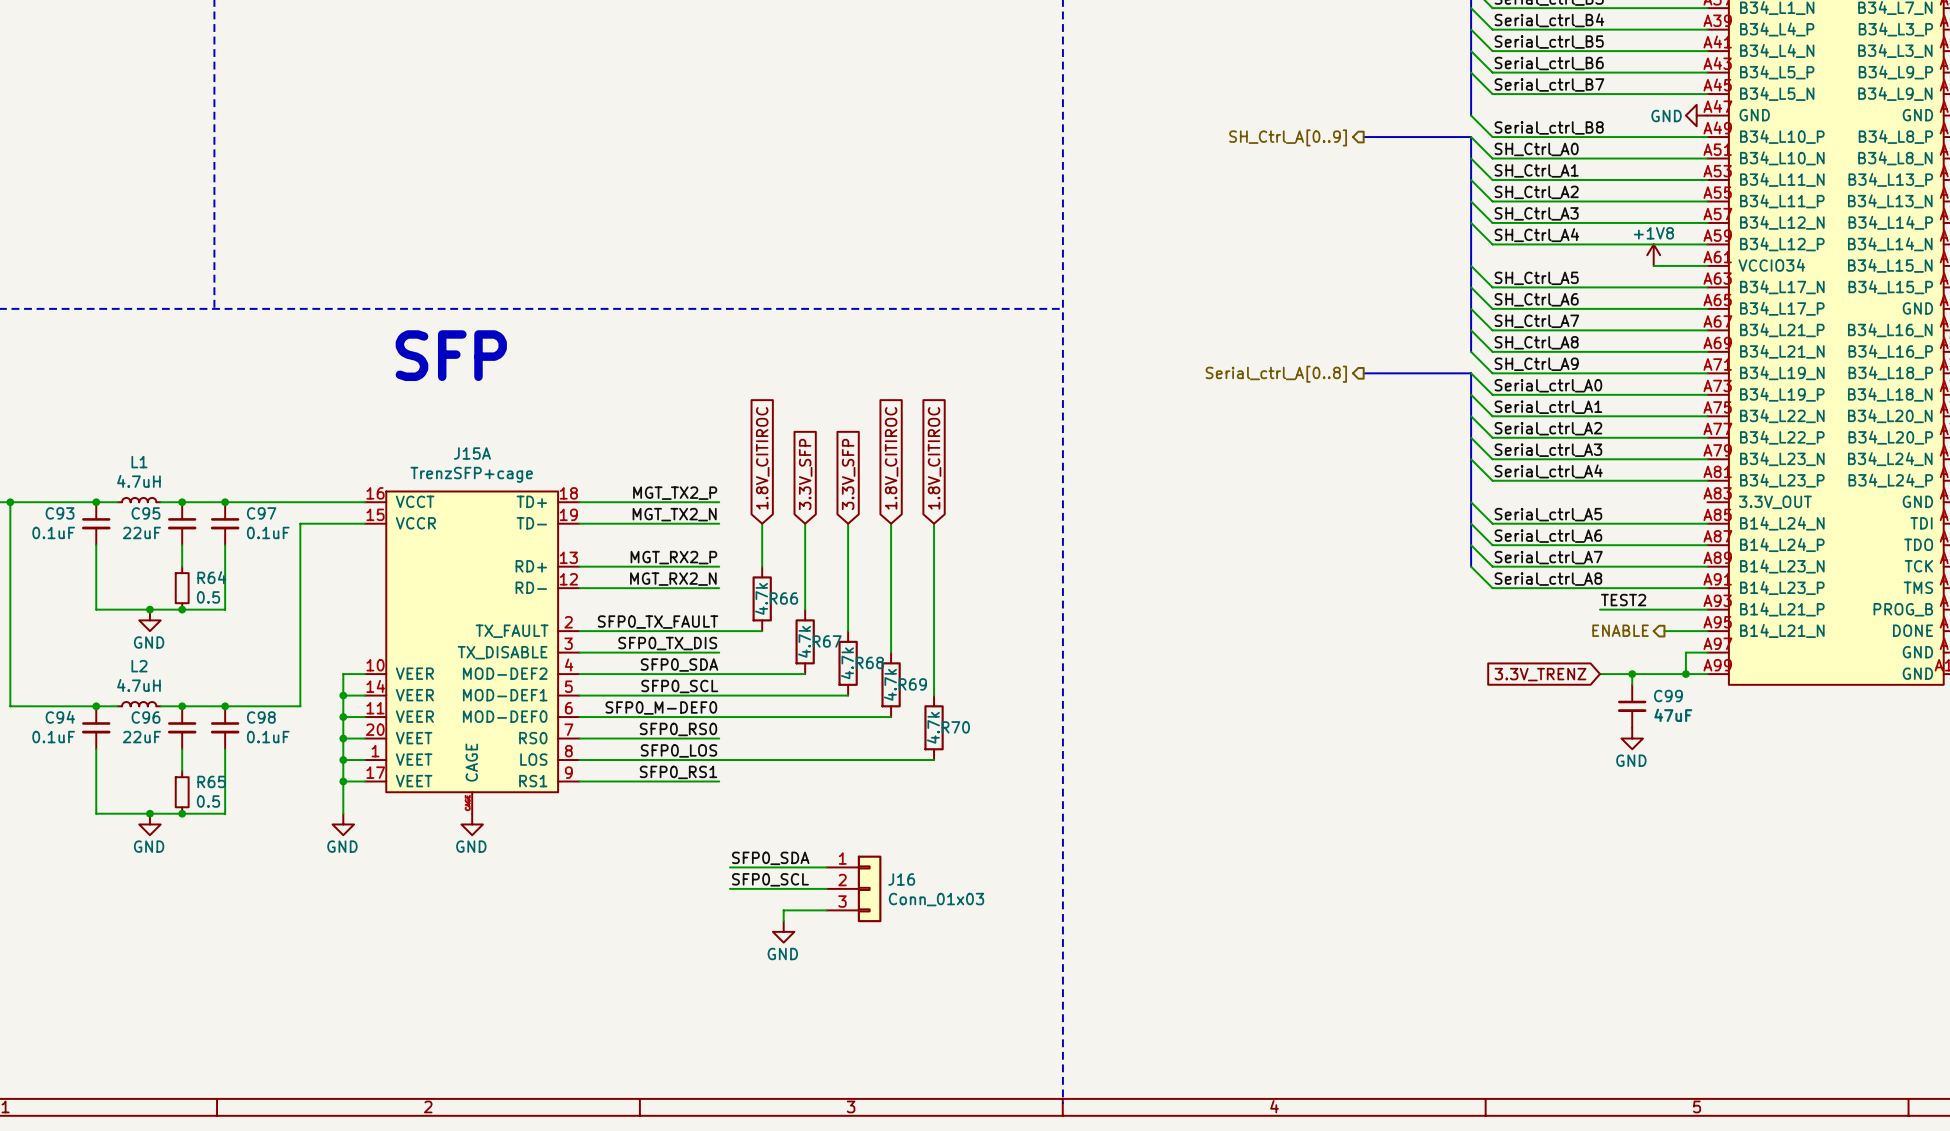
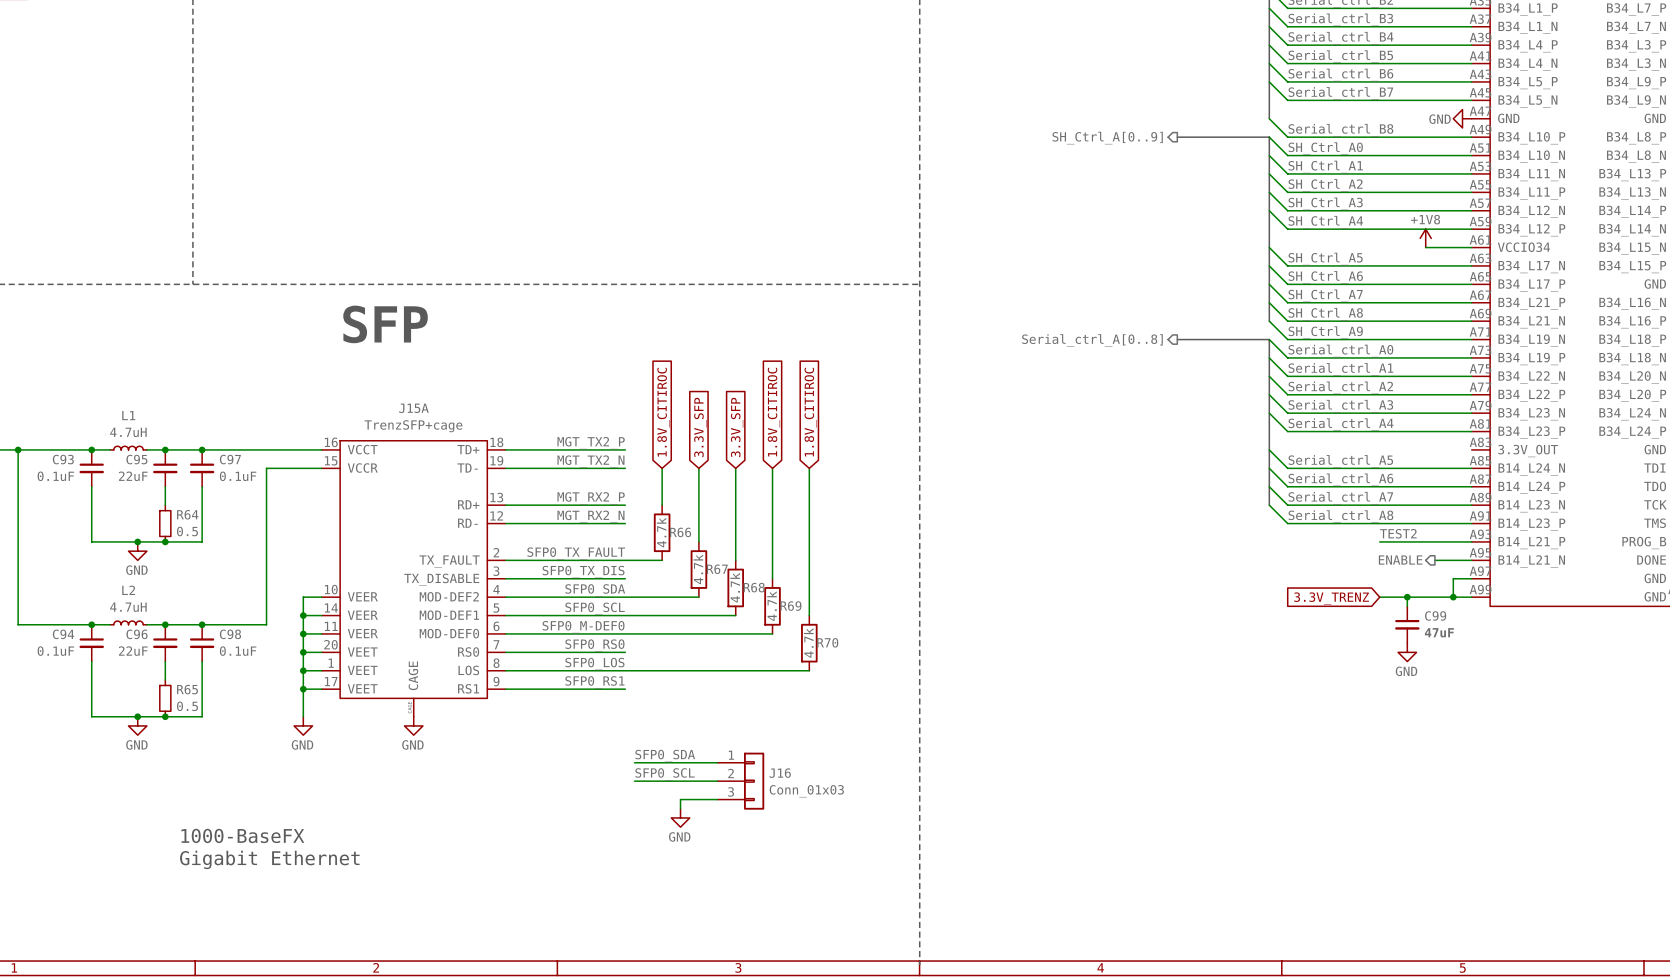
text: none -> 1000-BaseFX (242, 835)
text: none -> Gigabit Ethernet (269, 859)

